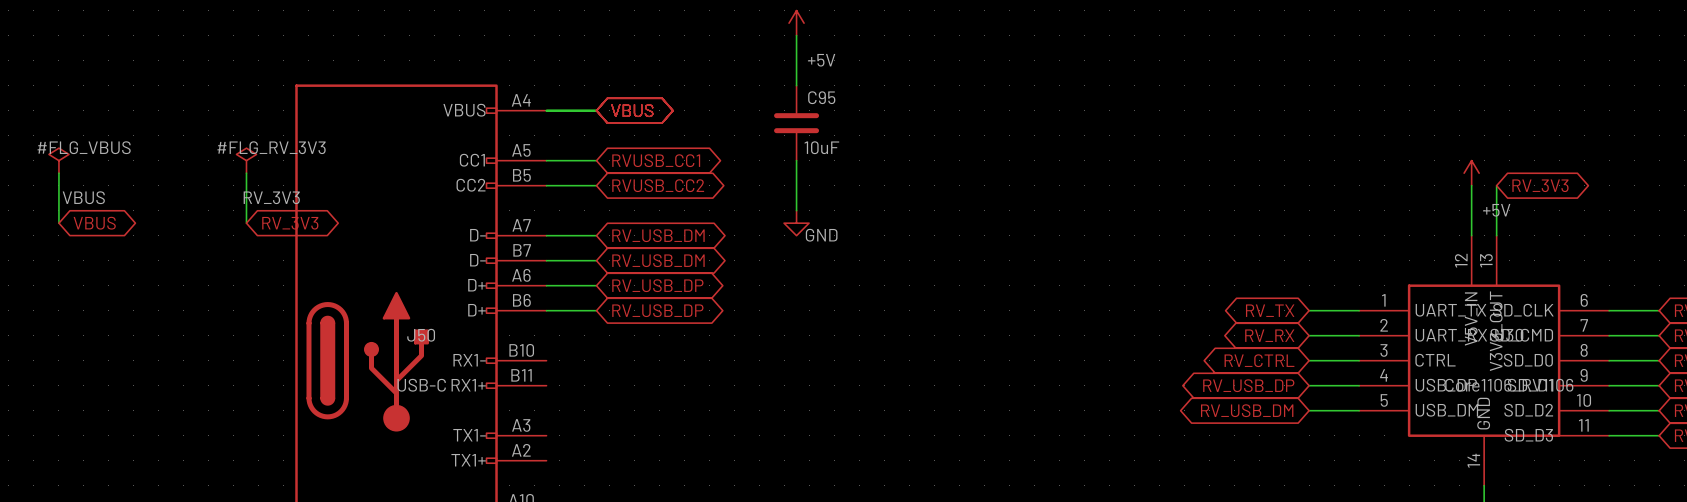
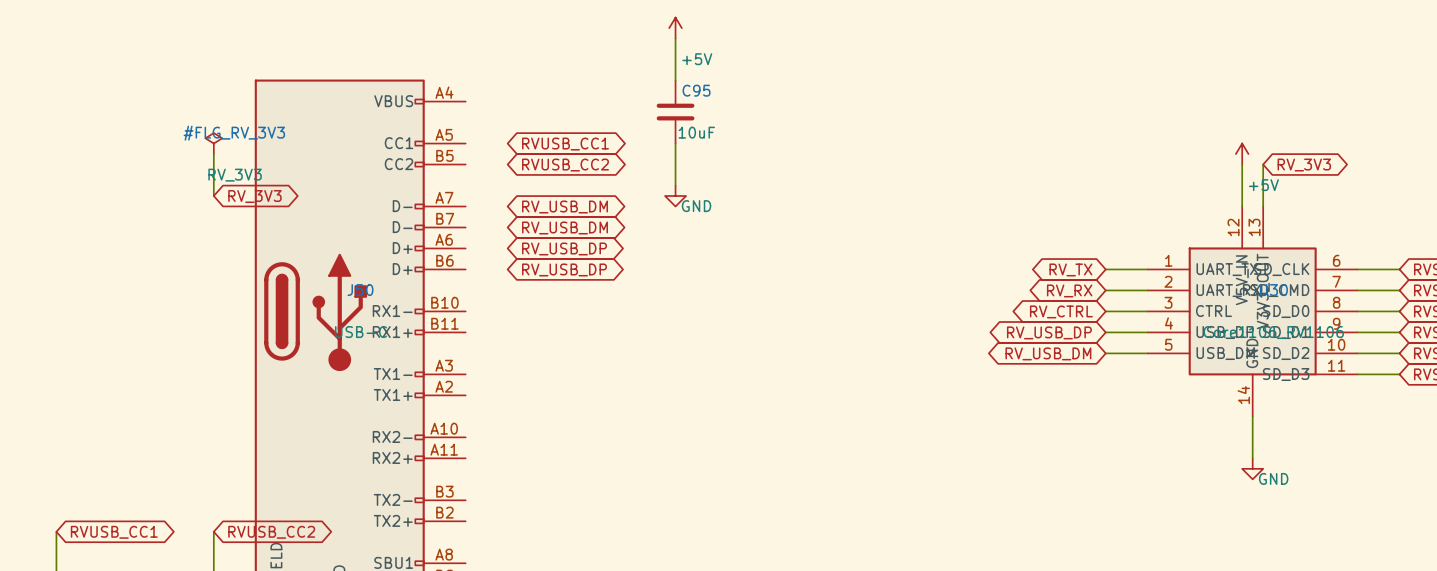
wire: (546, 110) (596, 110) -> none
global label: VBUS (632, 110) -> none
#FLG_VBUS: VBUS (58, 160) -> none
wire: (546, 160) (596, 160) -> none
wire: (58, 173) (58, 223) -> none
wire: (546, 185) (596, 185) -> none
global label: VBUS (94, 223) -> none
wire: (546, 235) (596, 235) -> none
wire: (546, 260) (596, 260) -> none
wire: (546, 285) (596, 285) -> none
wire: (546, 310) (596, 310) -> none

